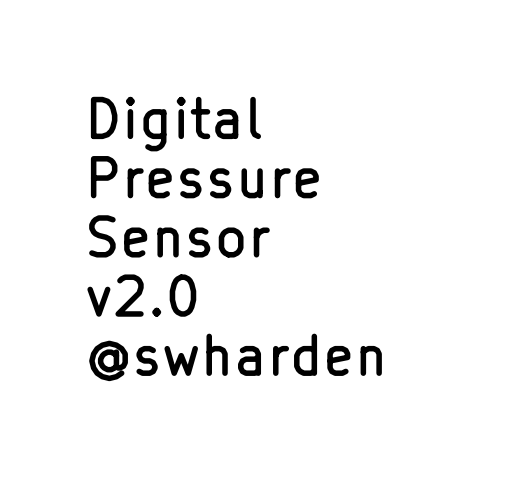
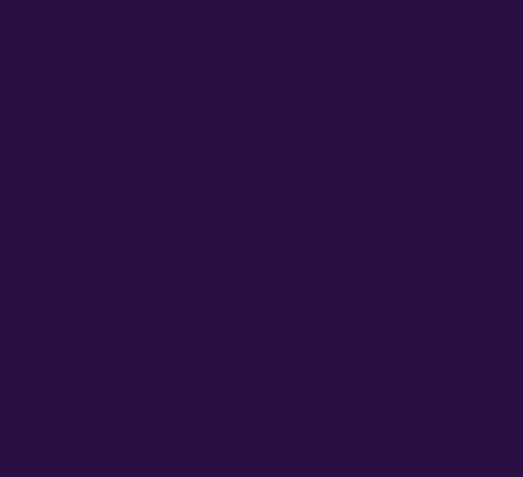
text: Digital (175, 124) -> none
text: Pressure (204, 177) -> none
text: Sensor (179, 236) -> none
text: v2.0 (141, 295) -> none
text: @swharden (235, 357) -> none

